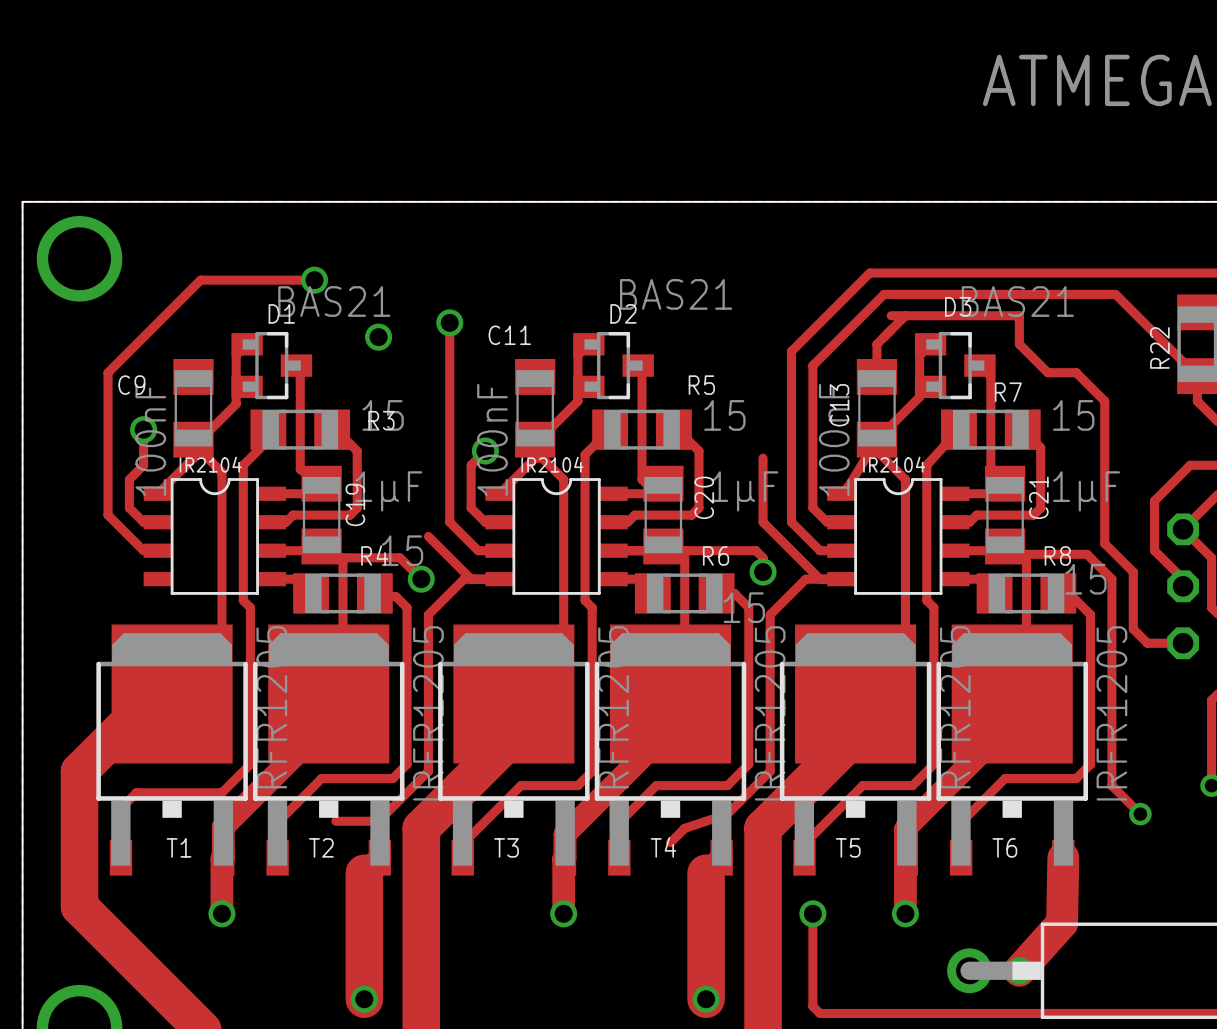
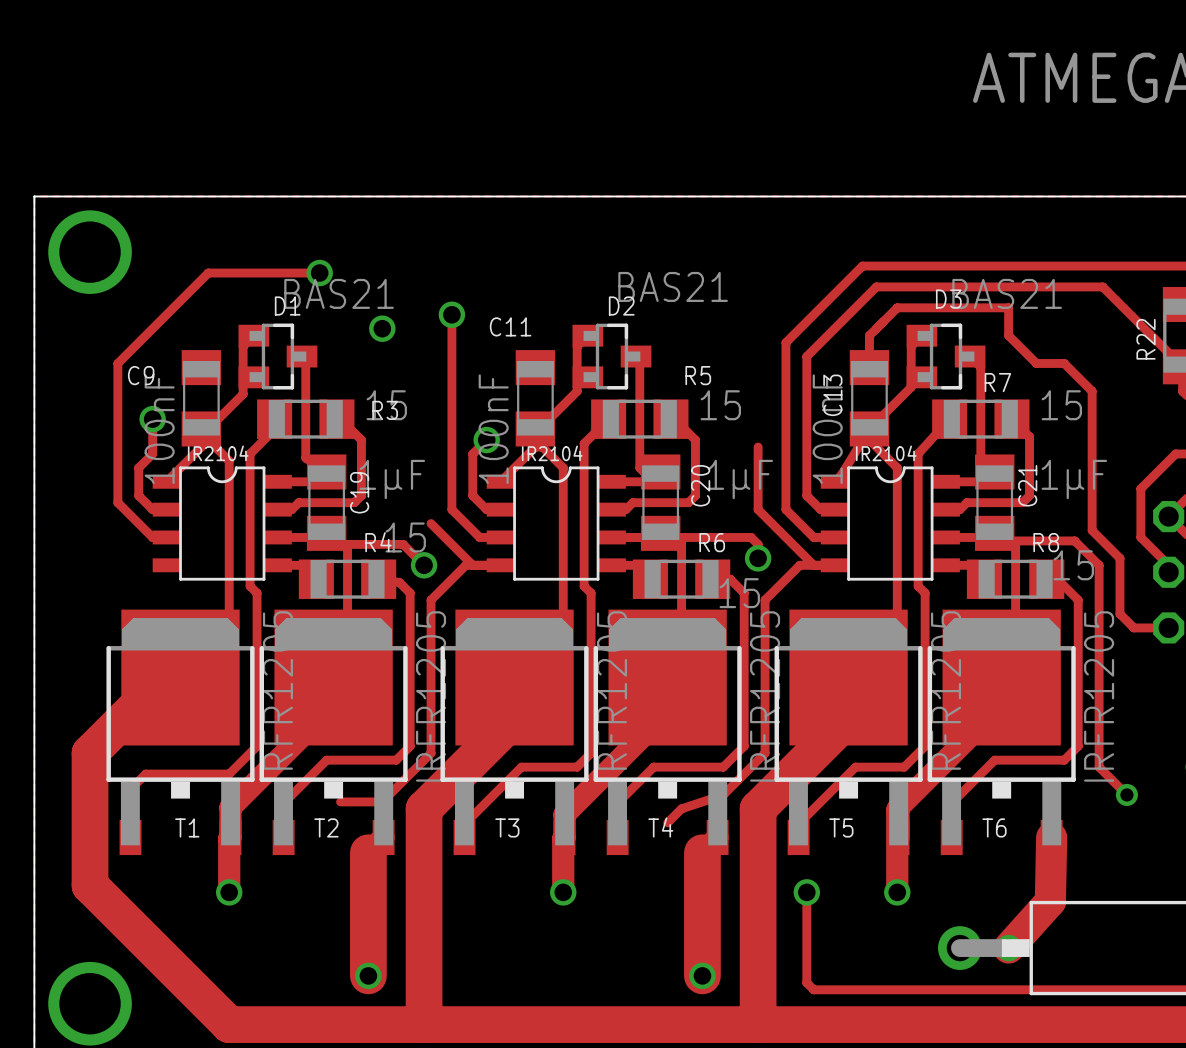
track: (891, 315) (905, 315) -> none

